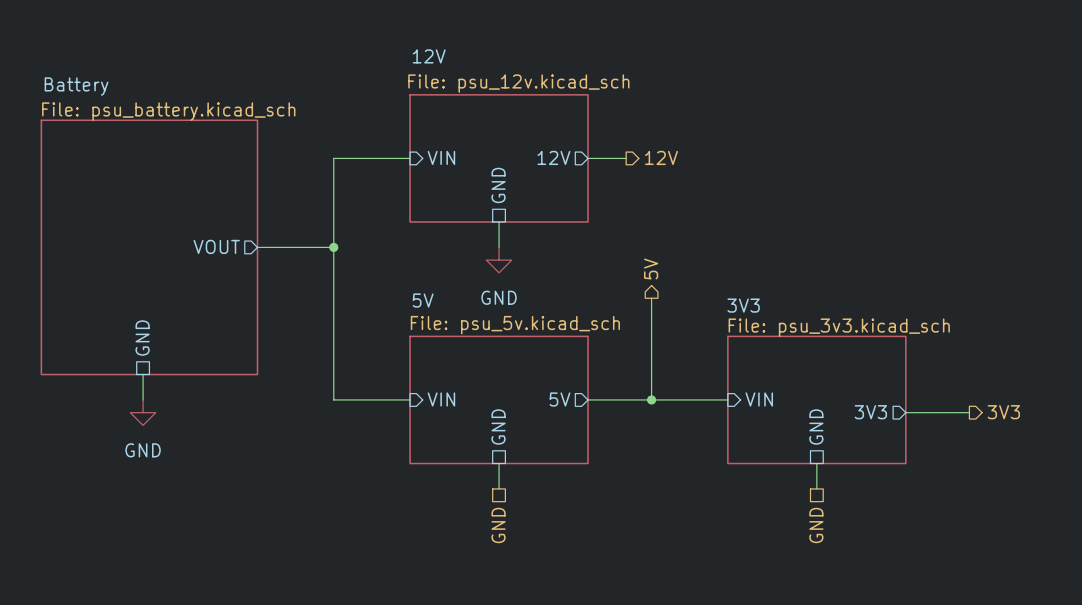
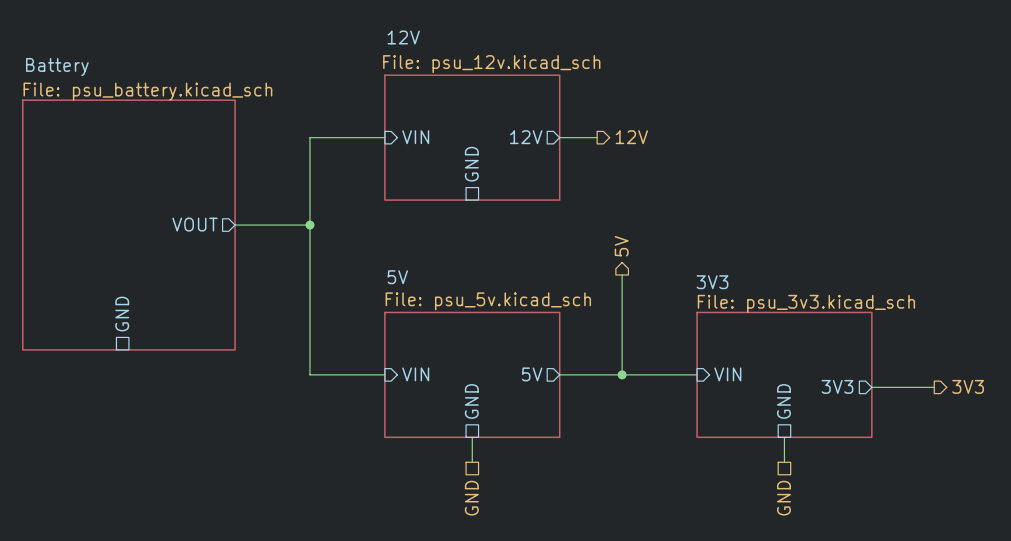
wire: (499, 221) (499, 247) -> none
power symbol: GND (499, 260) -> none
wire: (143, 374) (143, 399) -> none
power symbol: GND (143, 412) -> none

